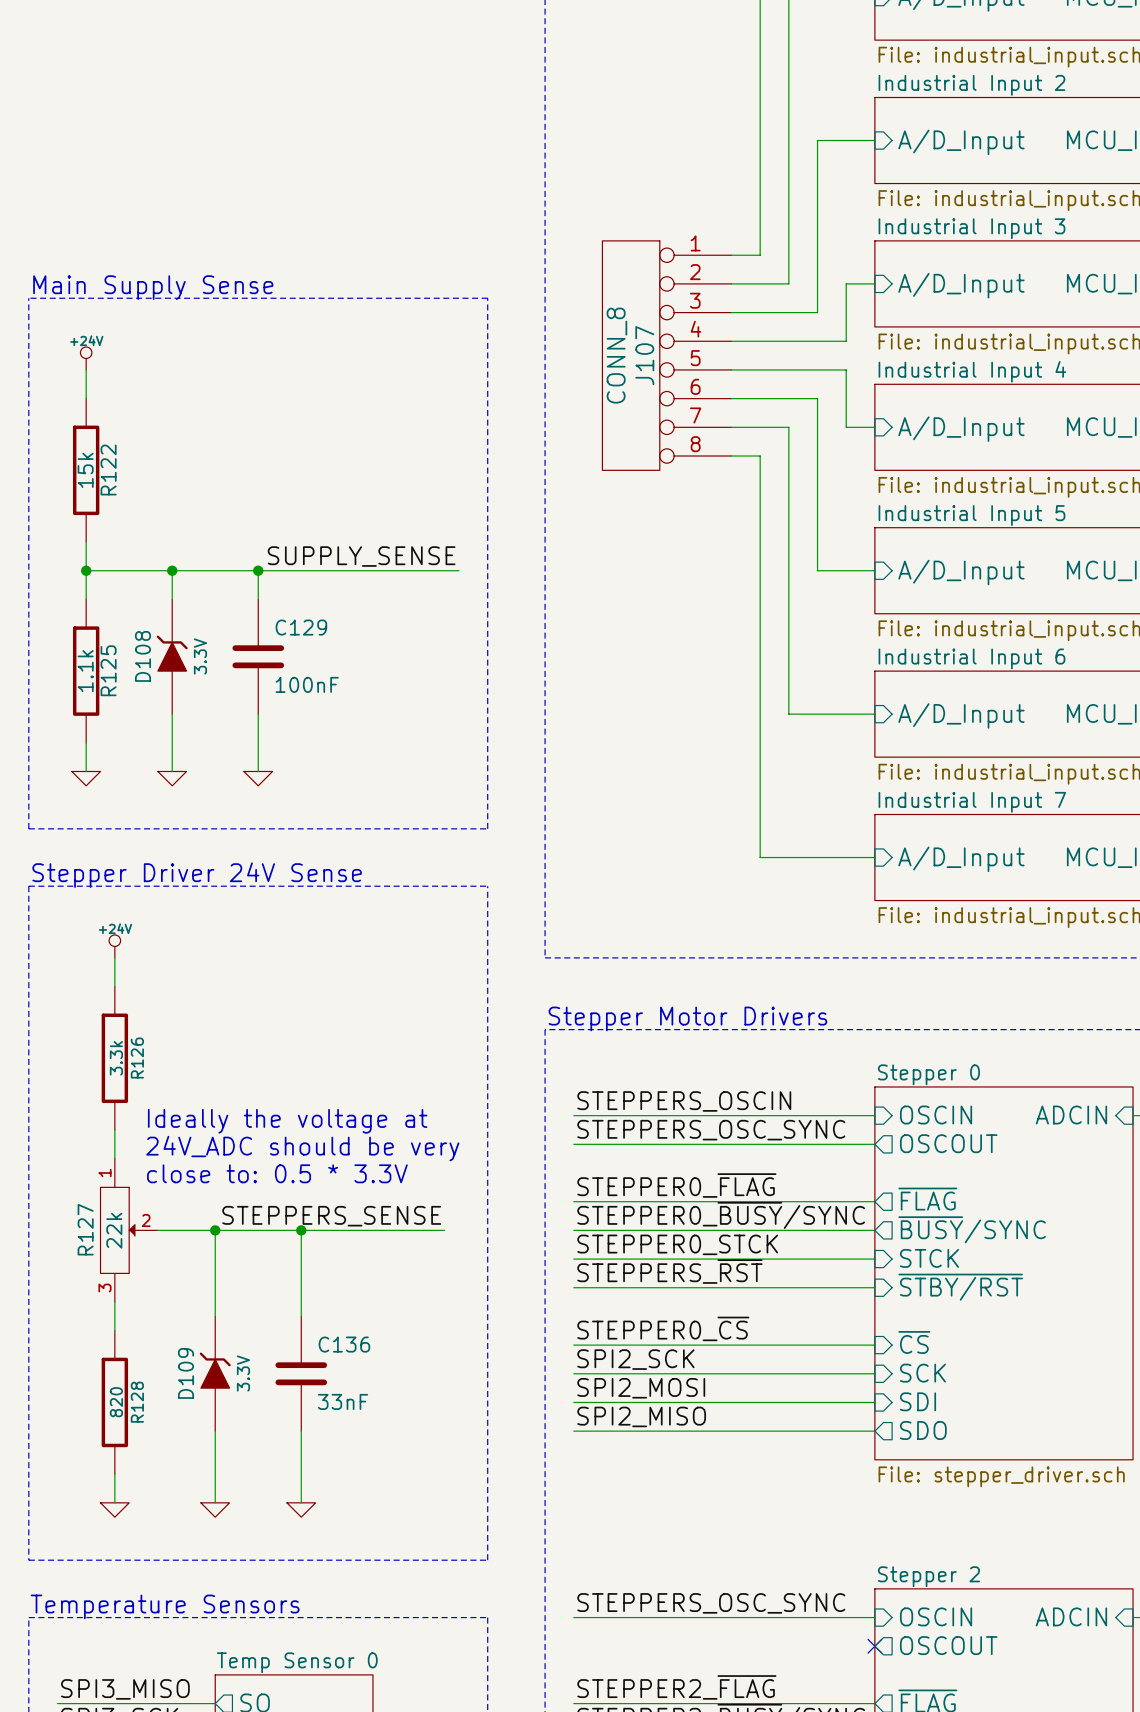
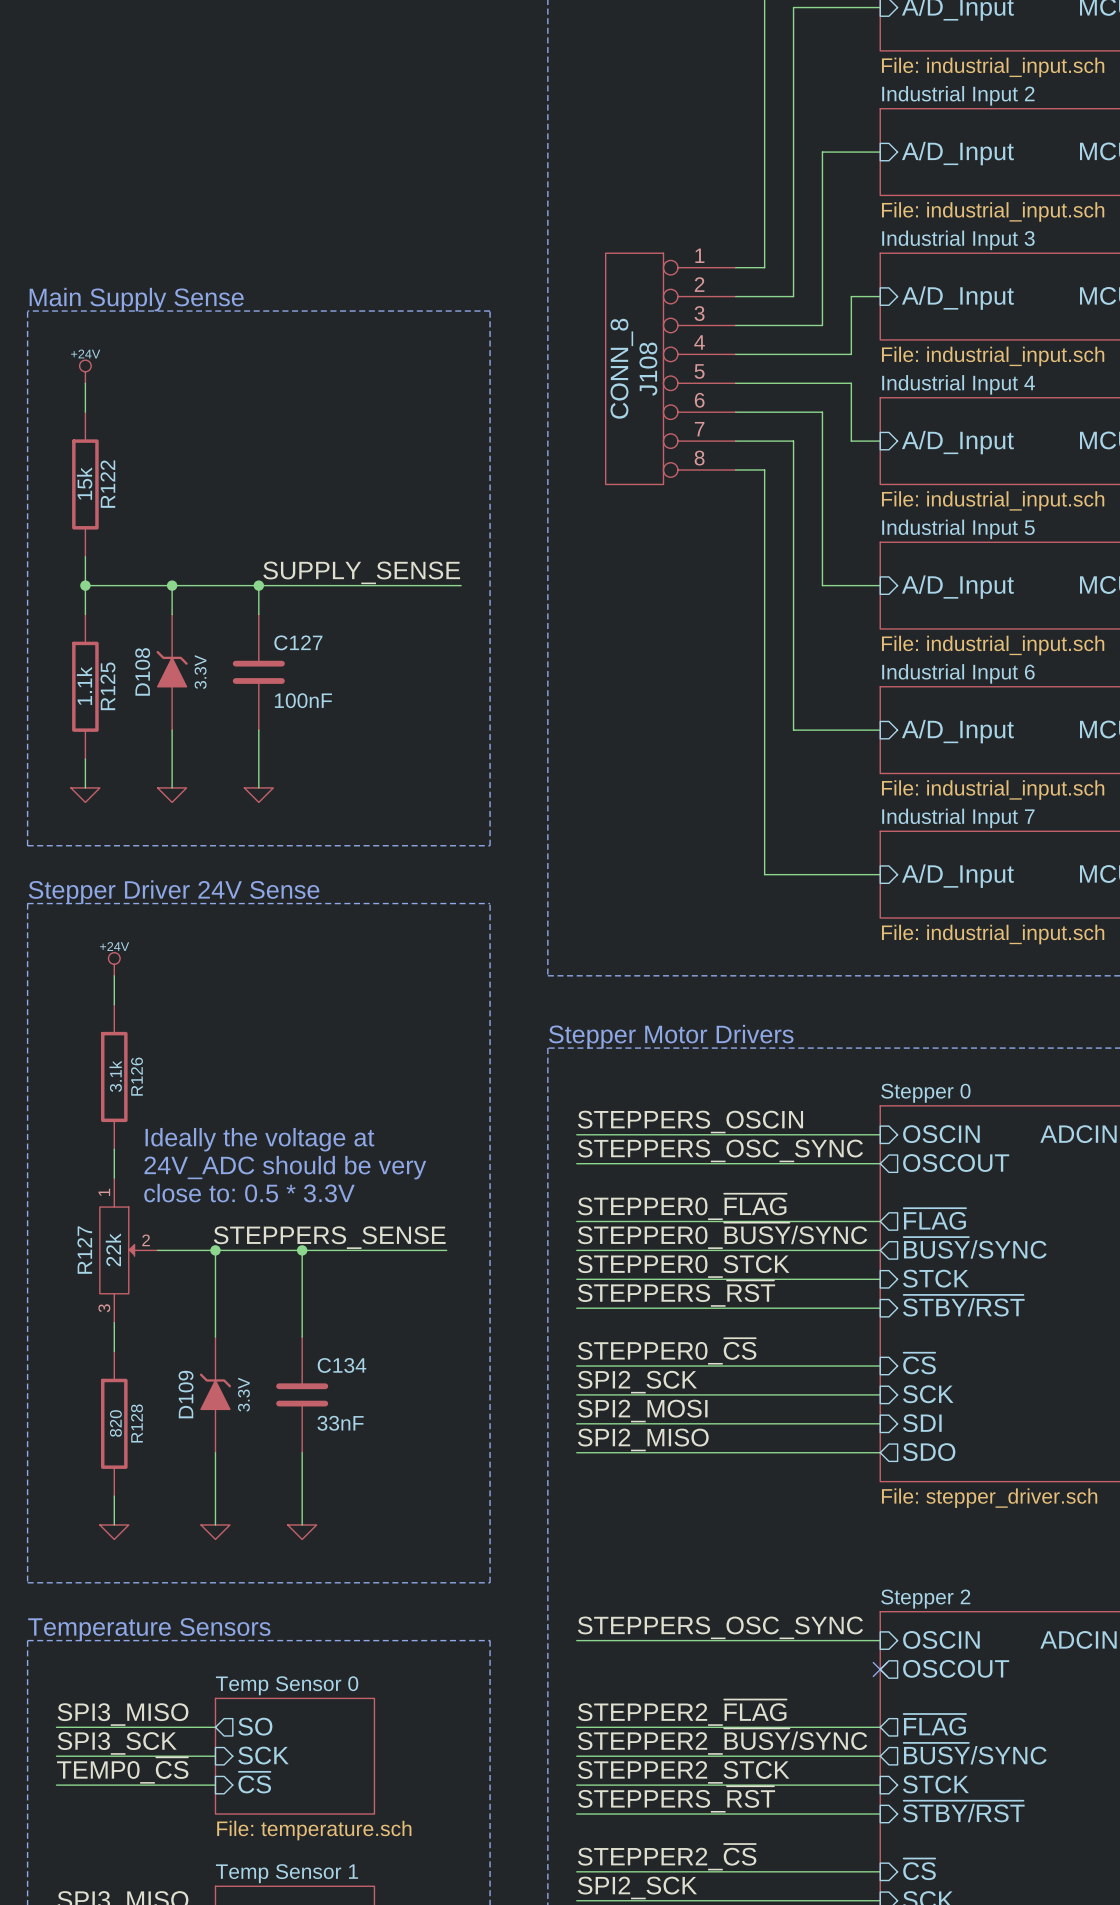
J107 name: J107 (644, 355) -> J108 (648, 369)
C129 name: C129 (301, 627) -> C127 (298, 642)
R126 value: 3.3k (116, 1058) -> 3.1k (115, 1076)
C136 name: C136 (344, 1344) -> C134 (341, 1365)

